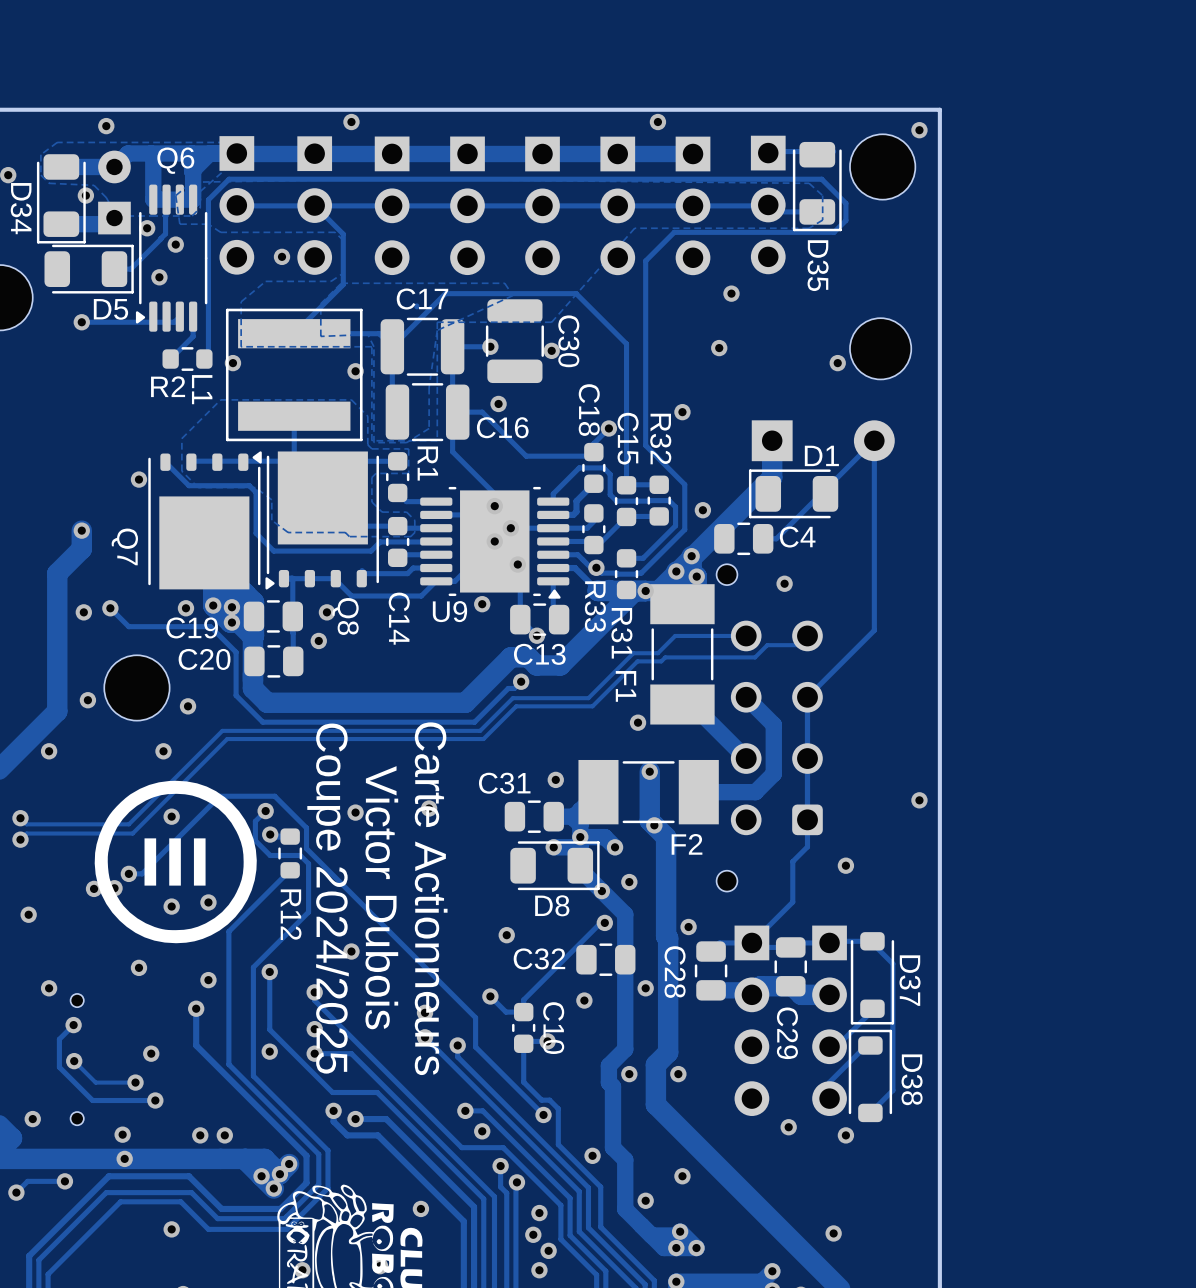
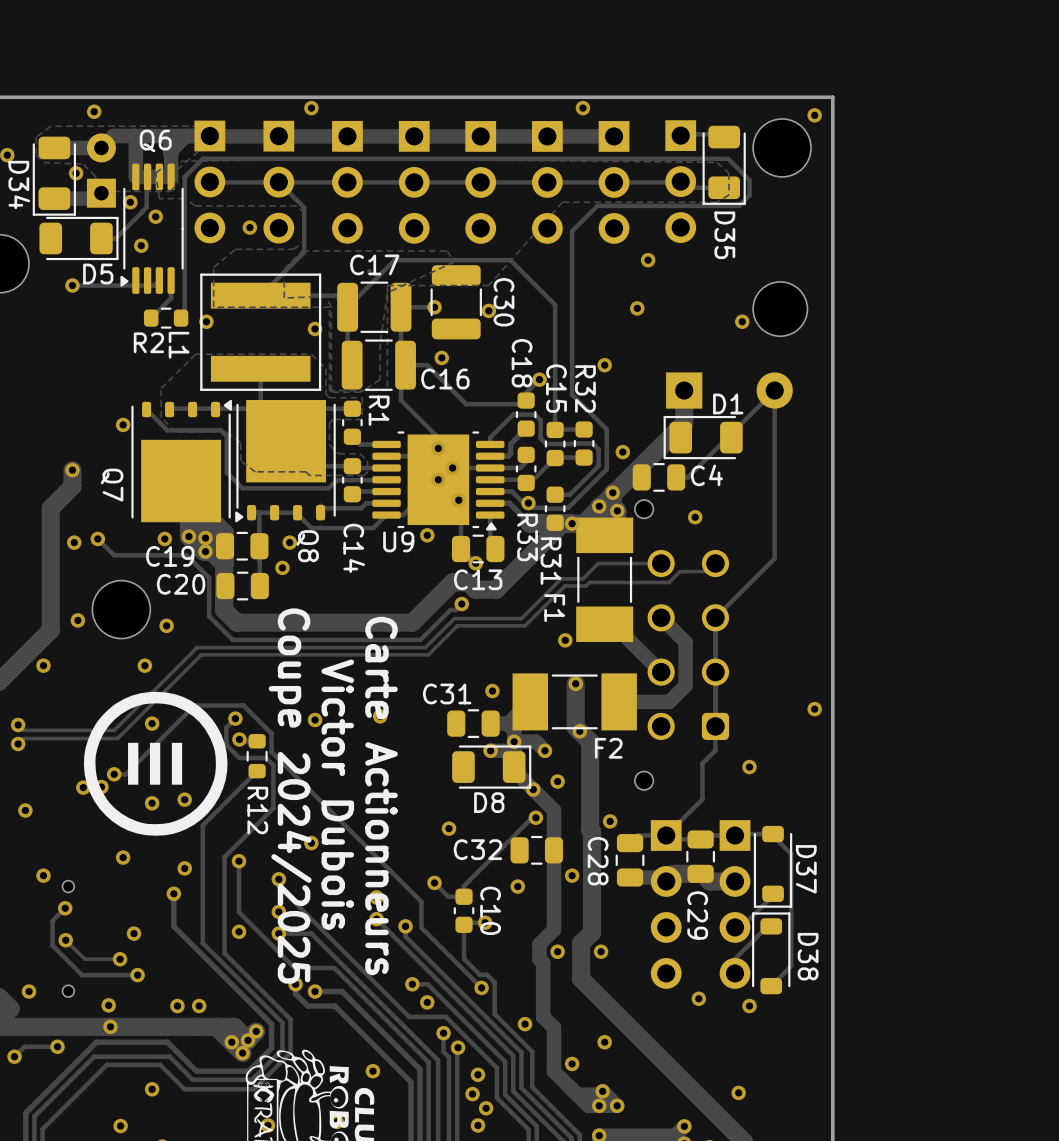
via: none -> (120, 1126)

